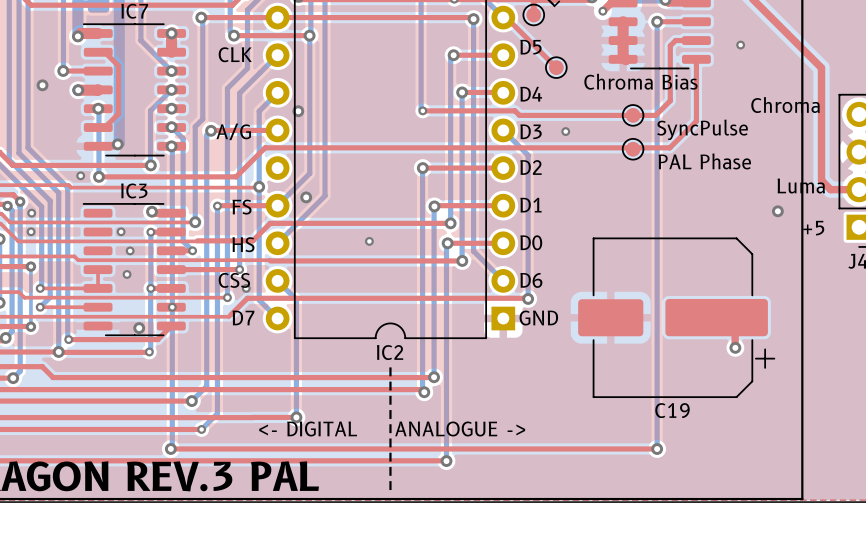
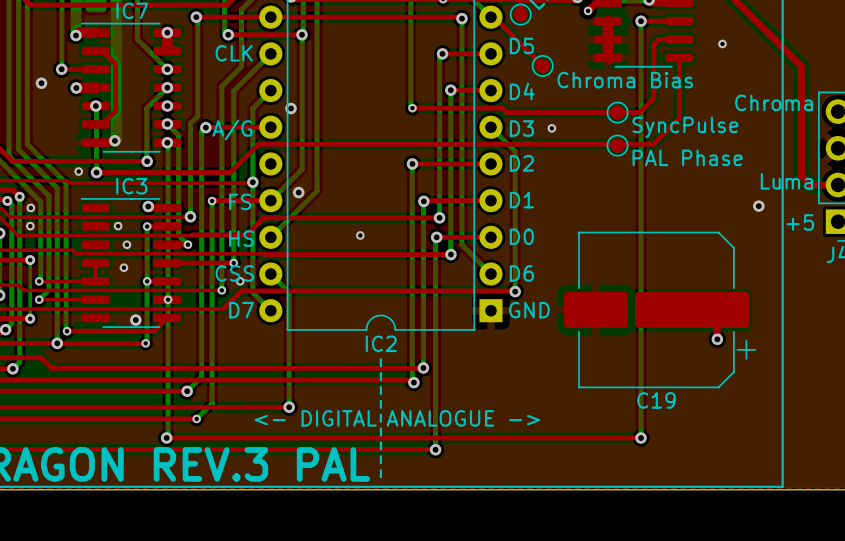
C19 footprint: [578, 237, 776, 399] -> [564, 231, 757, 389]

